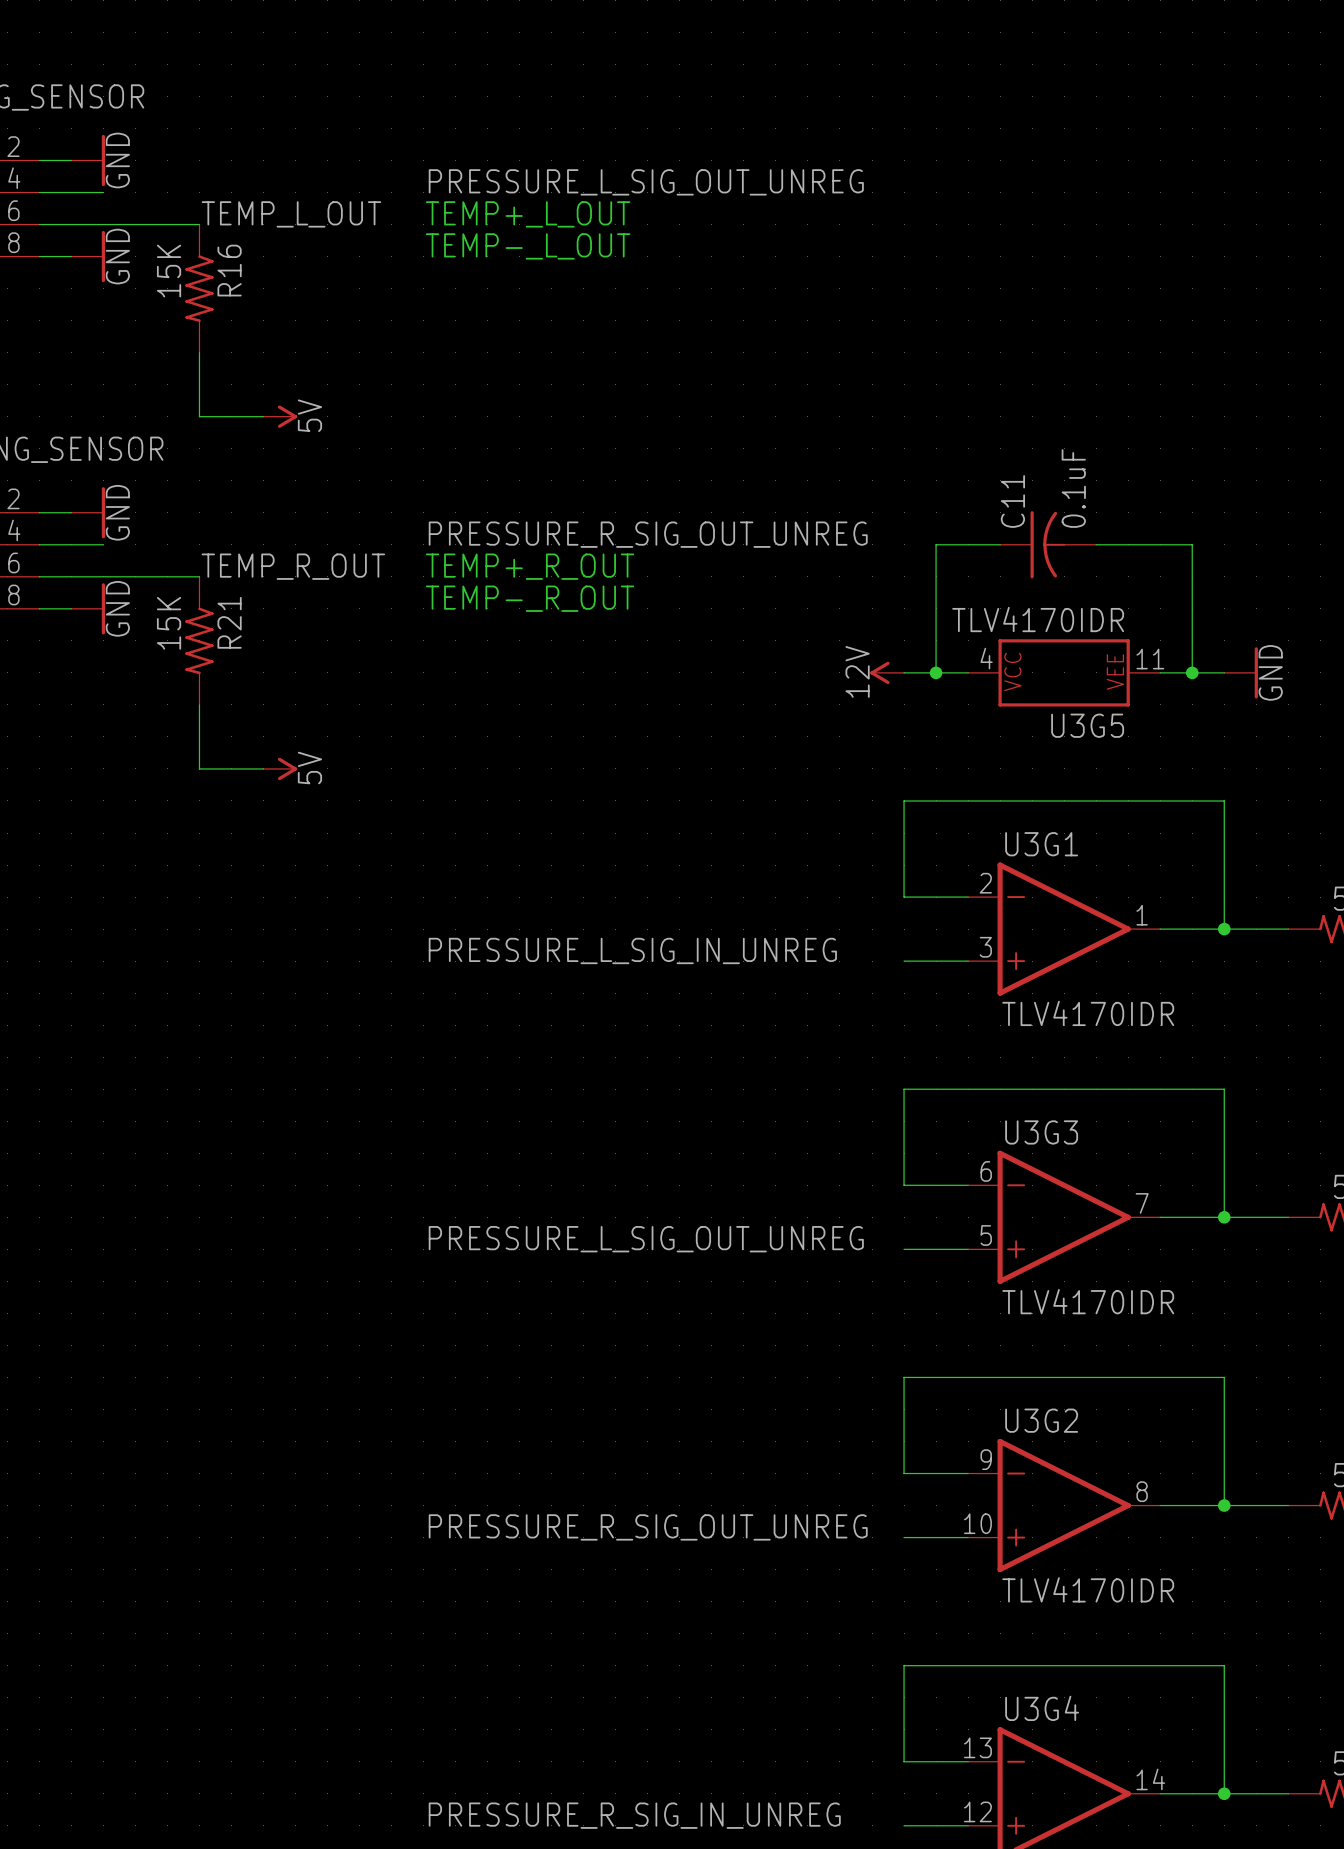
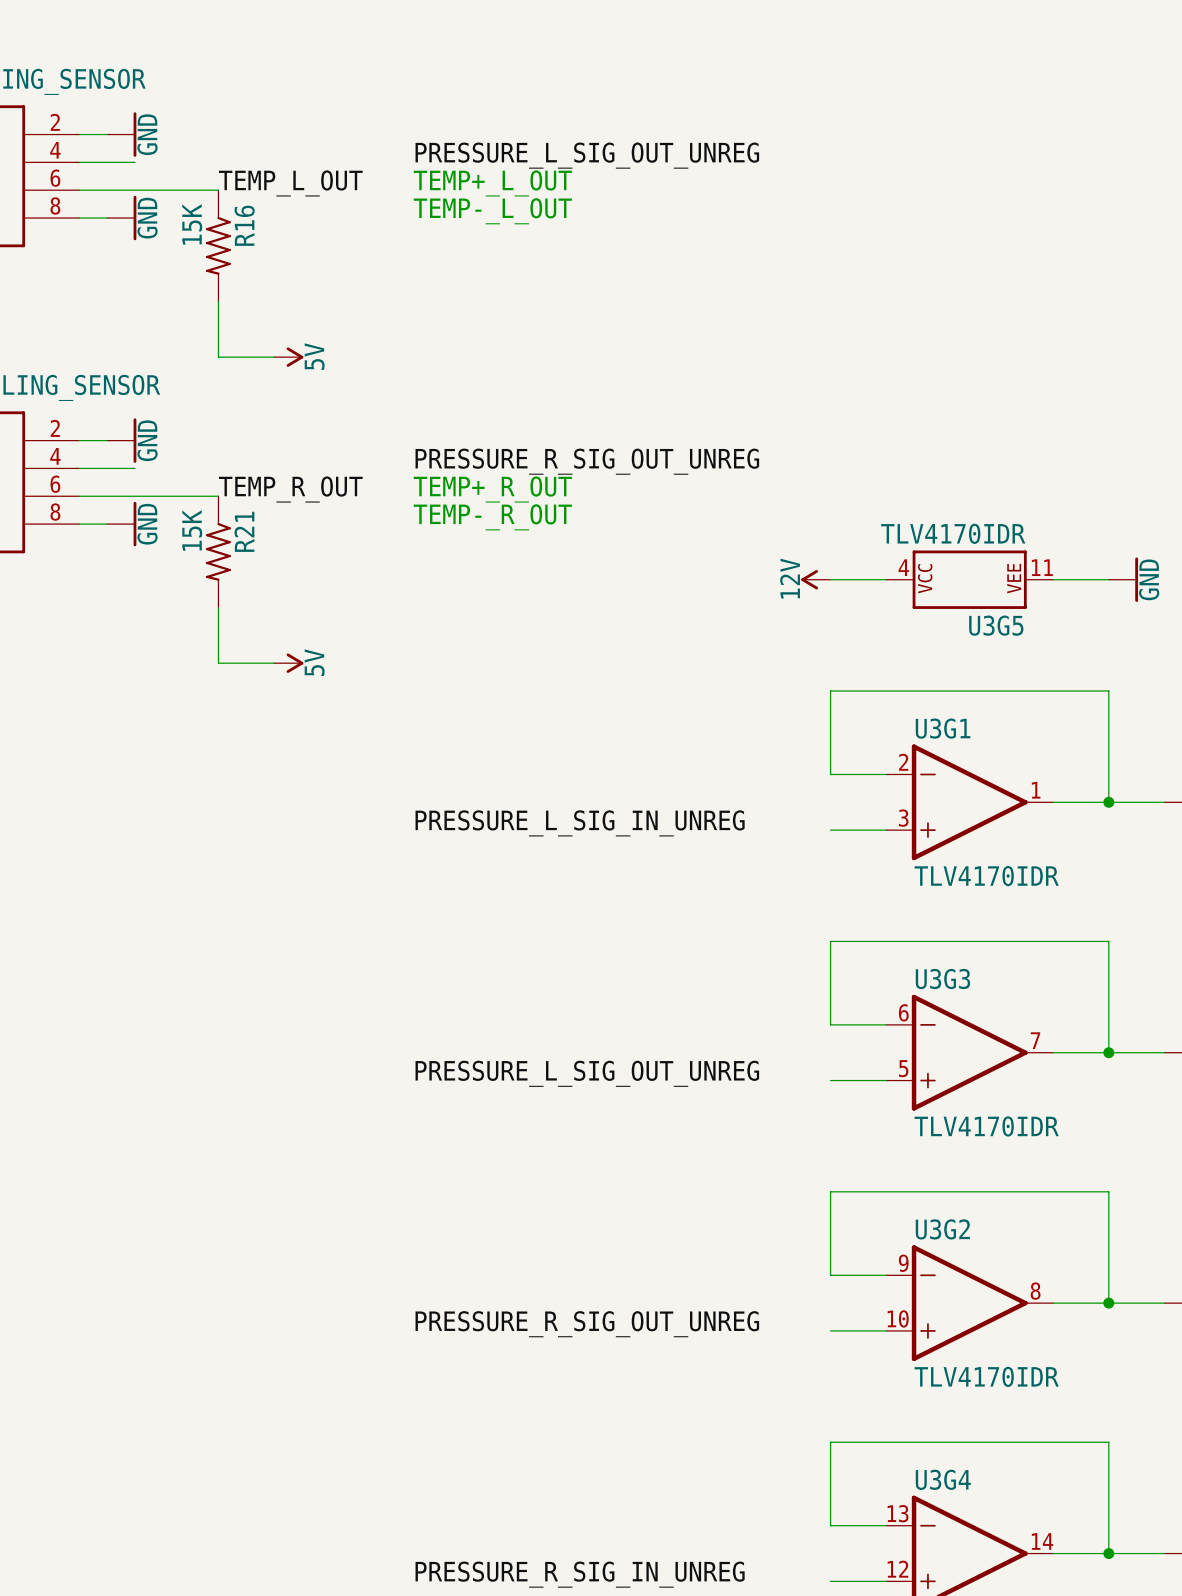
wire: (1000, 544) (936, 544) (936, 672) -> none
C11: 0.1uF (1048, 544) -> none
wire: (1096, 544) (1192, 544) (1192, 672) -> none
junction: (936, 672) -> none
junction: (1192, 672) -> none

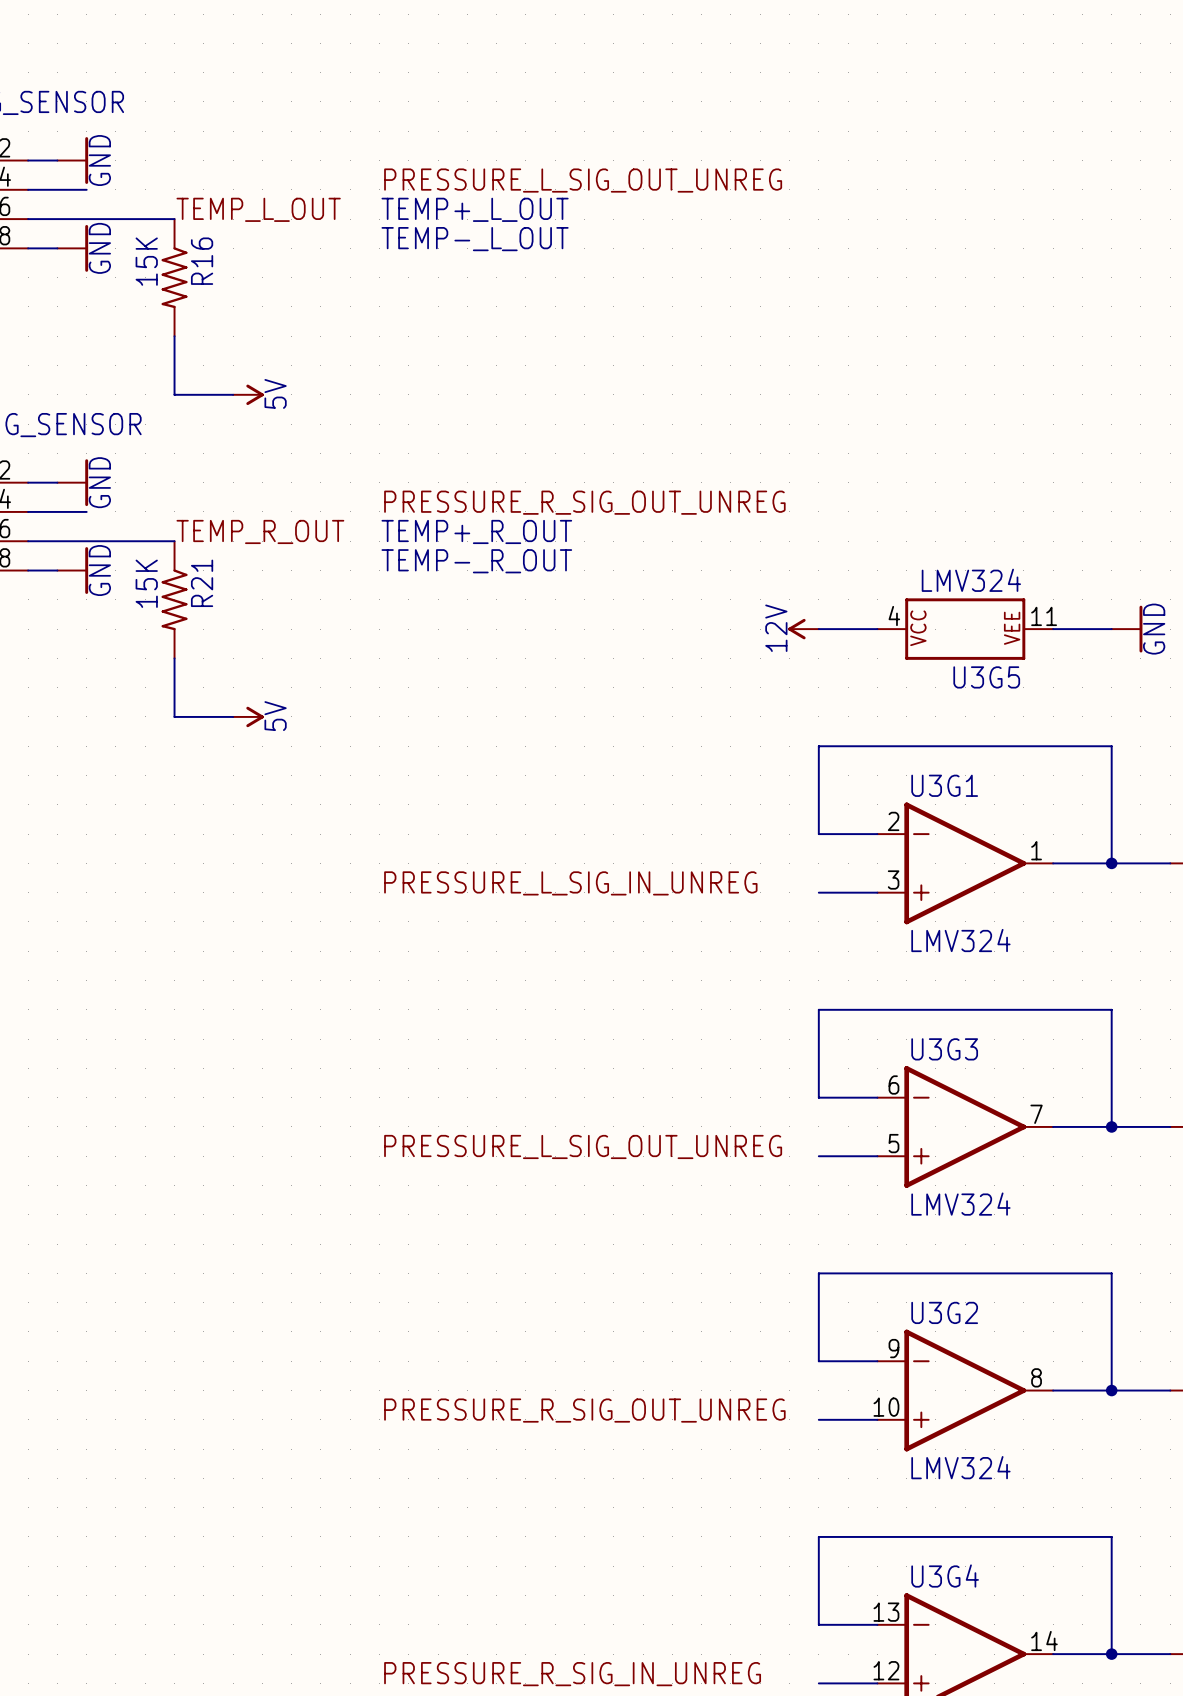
U3G5 value: TLV4170IDR (953, 533) -> LMV324 (971, 580)
U3G1 value: TLV4170IDR (986, 876) -> LMV324 (960, 940)
U3G3 value: TLV4170IDR (986, 1126) -> LMV324 (960, 1204)
U3G2 value: TLV4170IDR (986, 1376) -> LMV324 (960, 1467)

